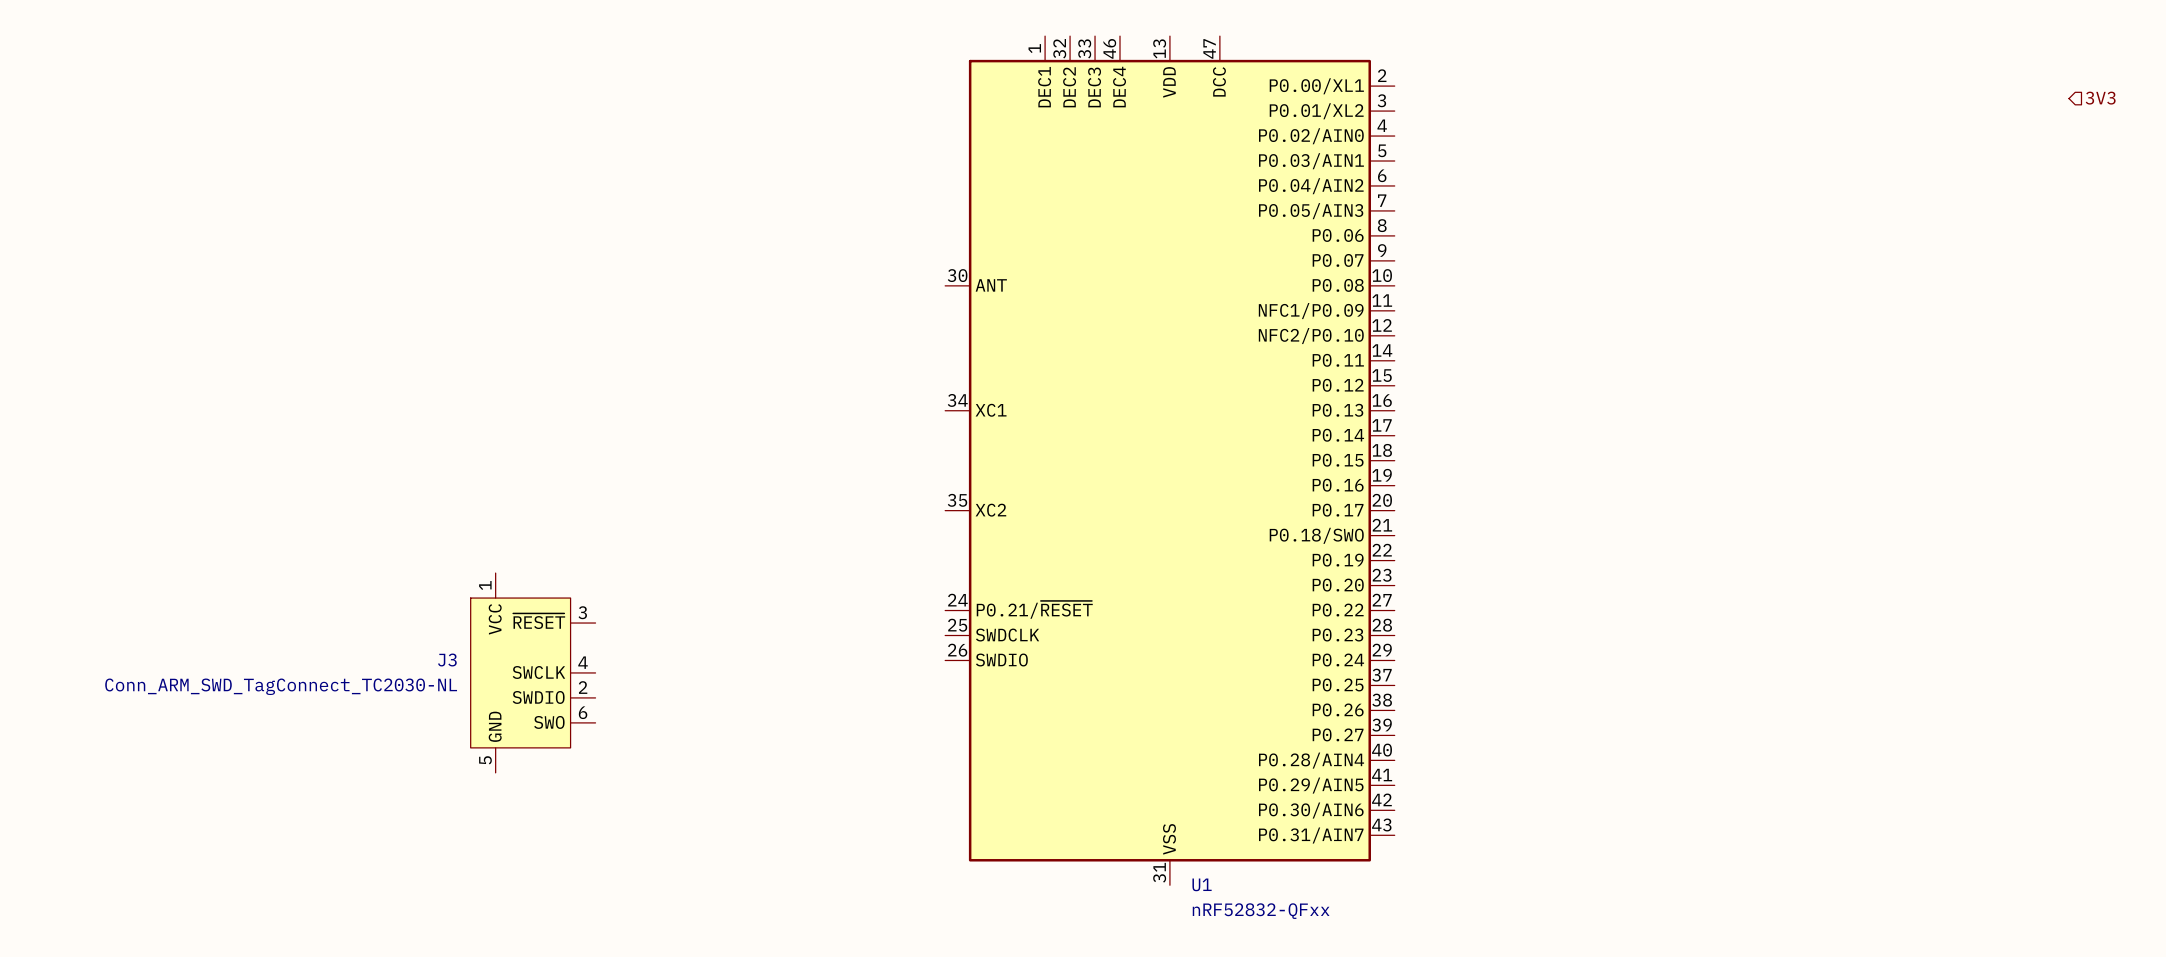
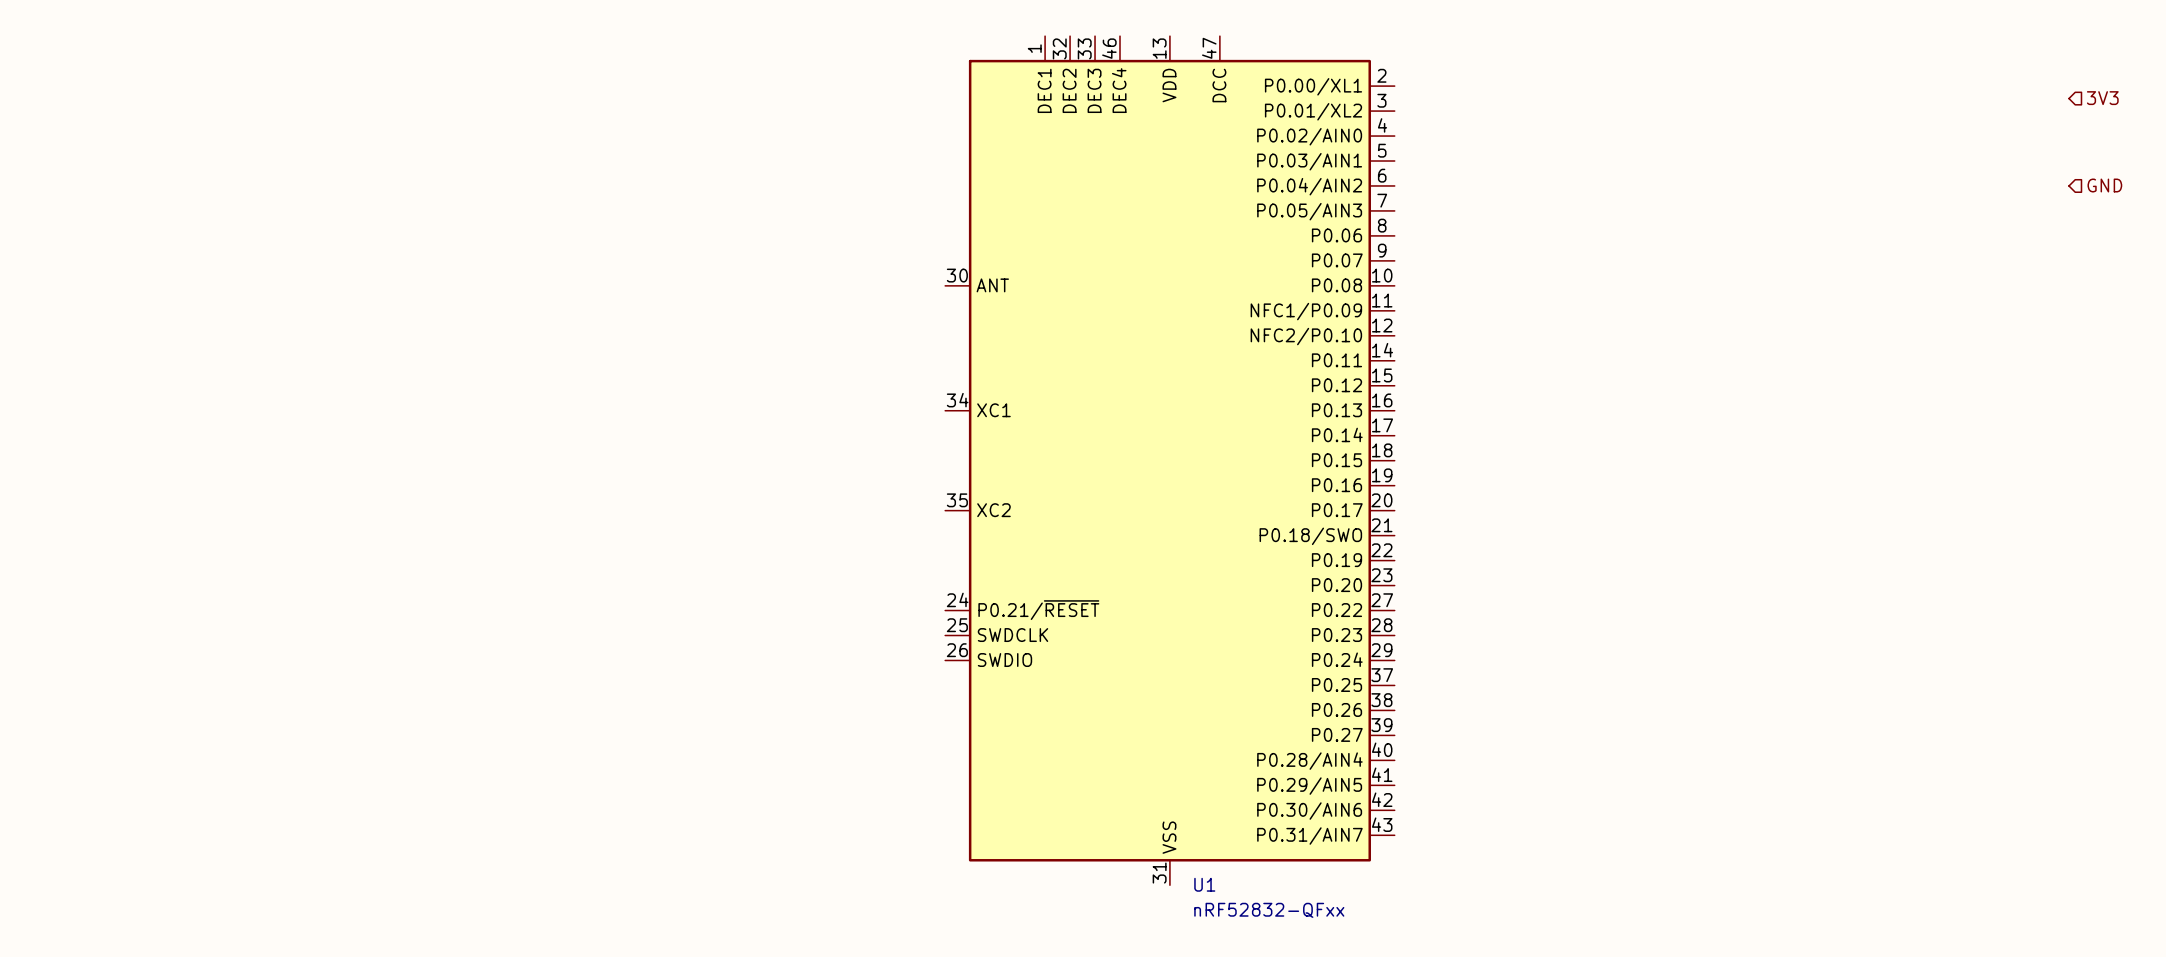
hierarchical label: none -> GND (2104, 185)
J3: Conn_ARM_SWD_TagConnect_TC2030-NL (533, 672) -> none

